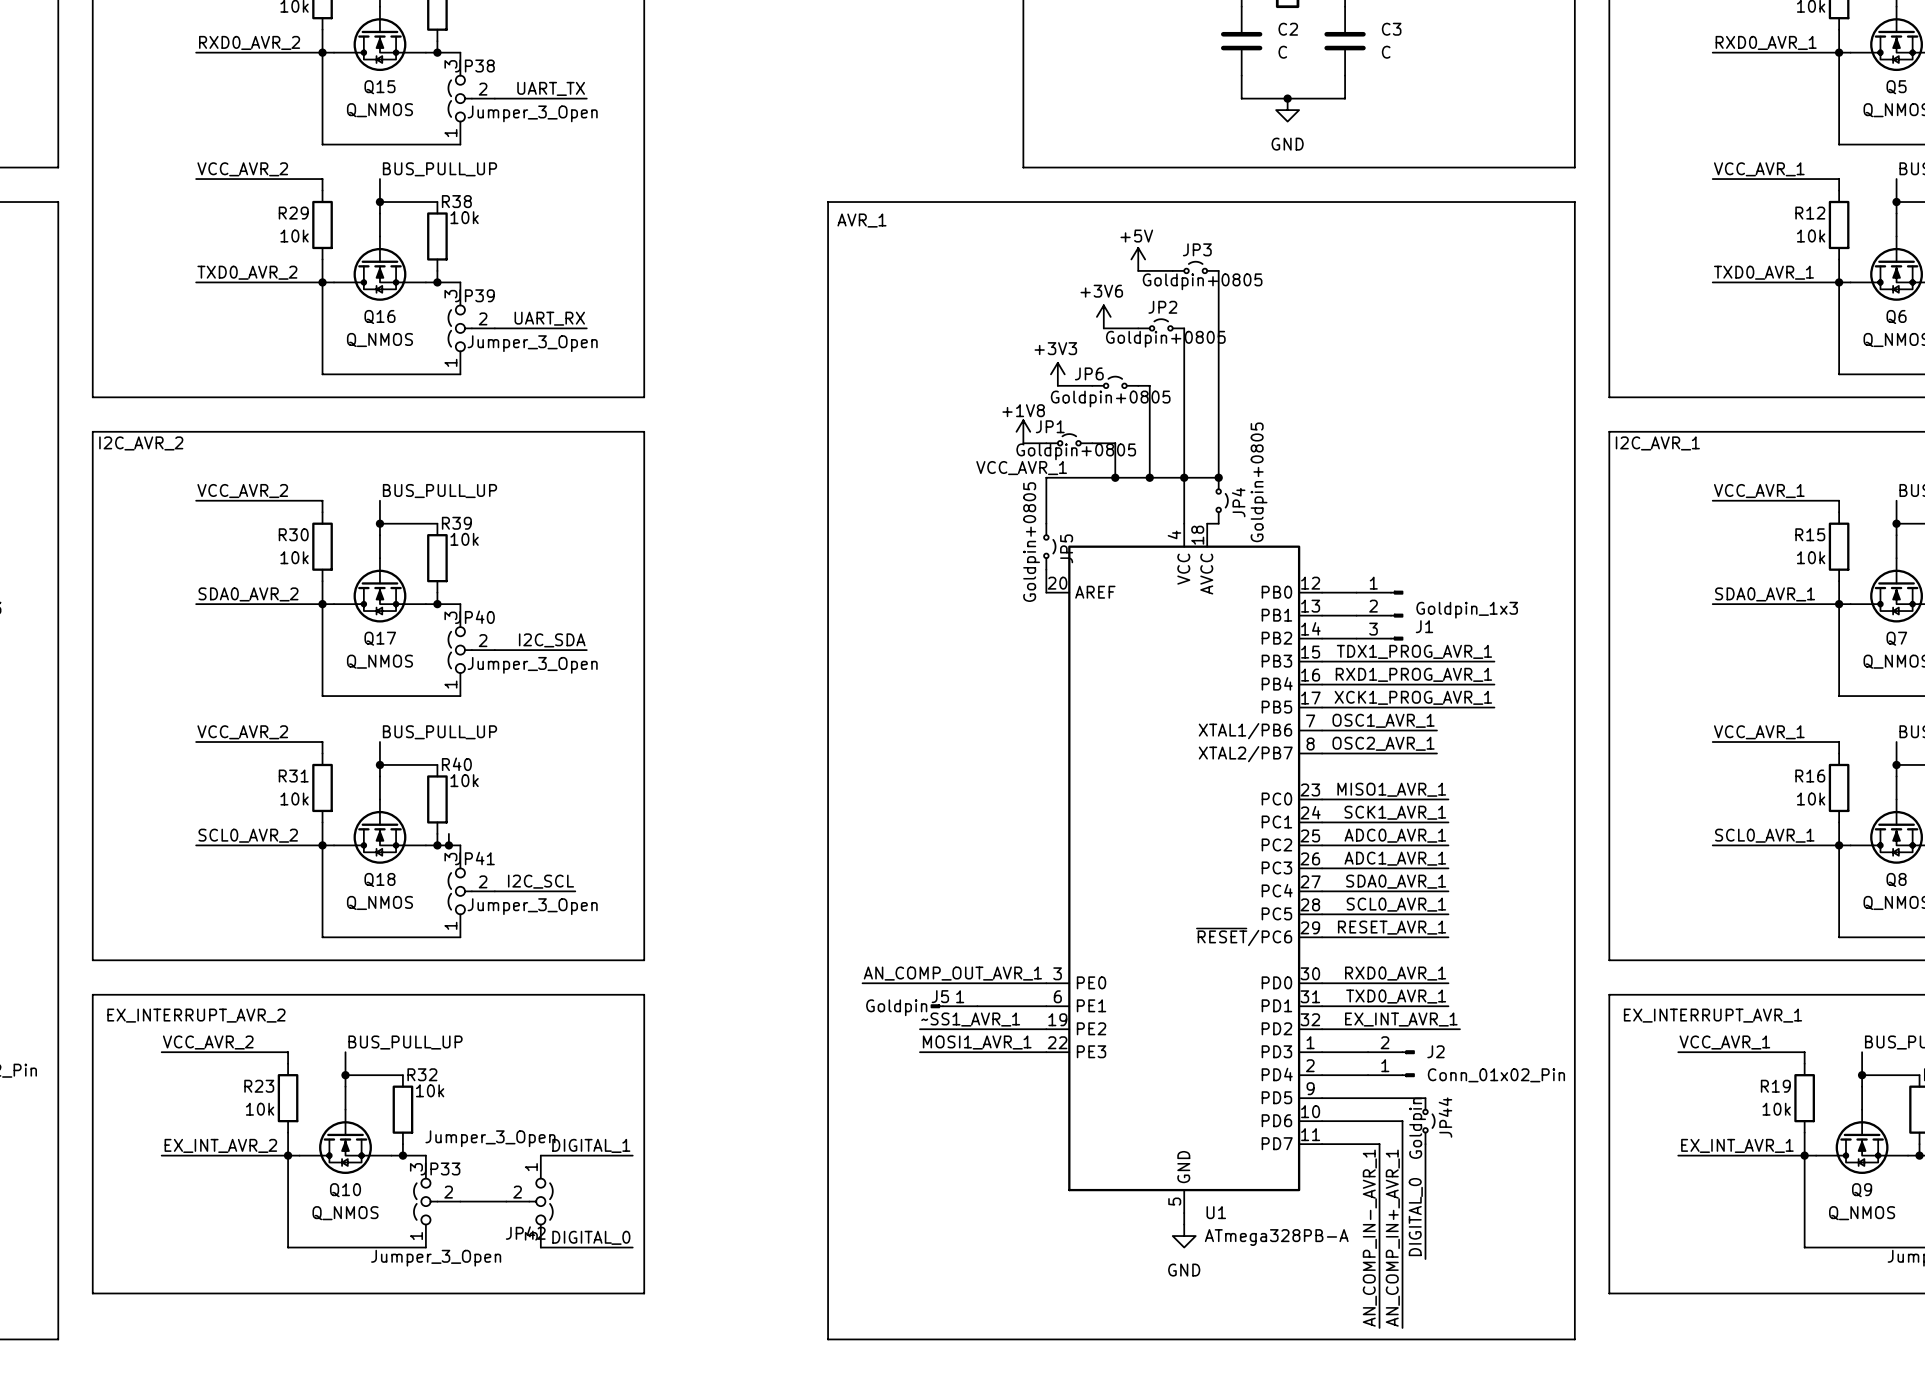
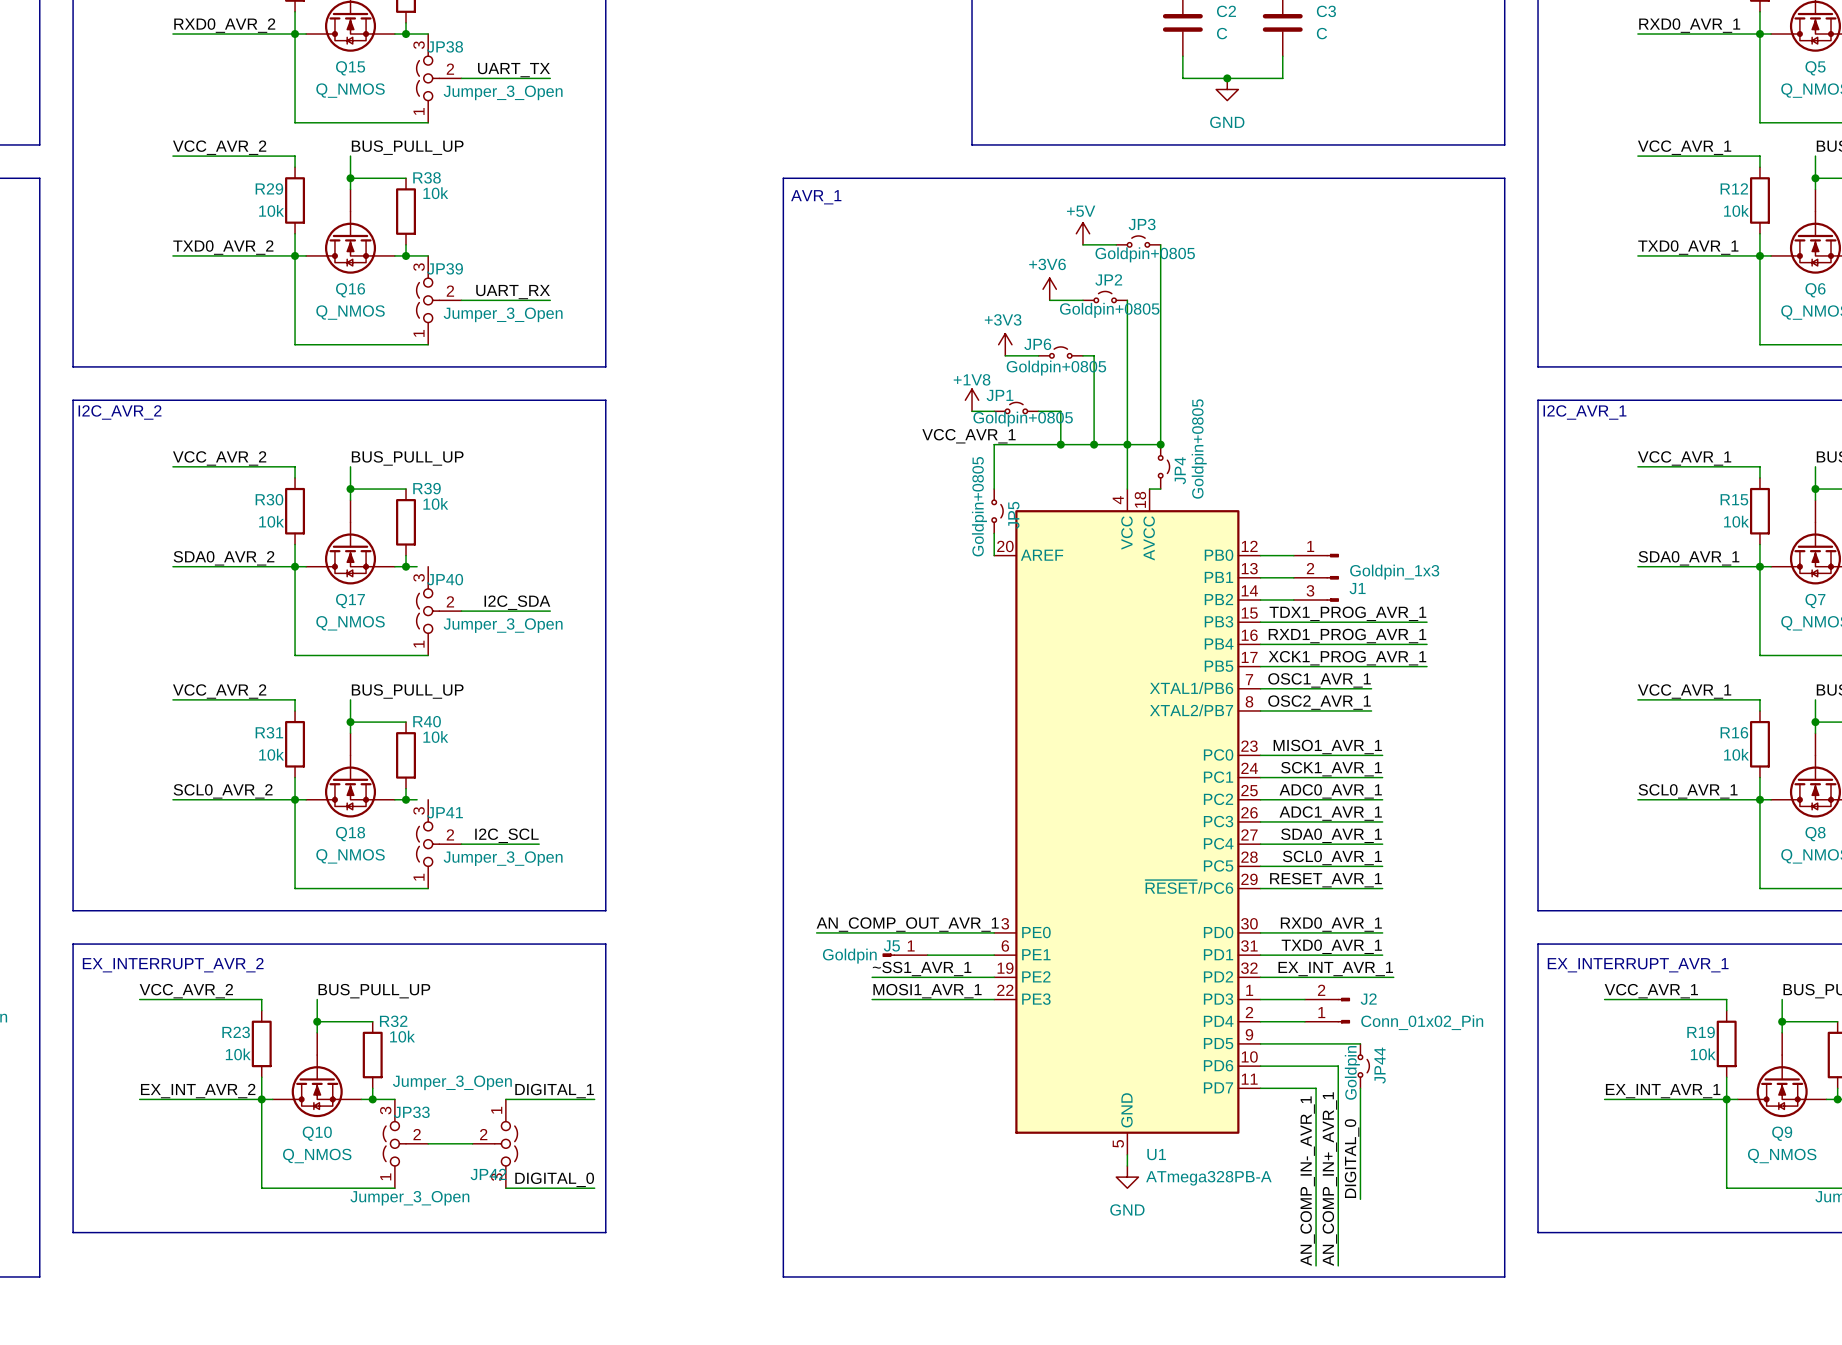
wire: (448, 604) (460, 604) -> none
wire: (448, 833) (448, 845) (460, 845) -> none
junction: (448, 845) -> none

